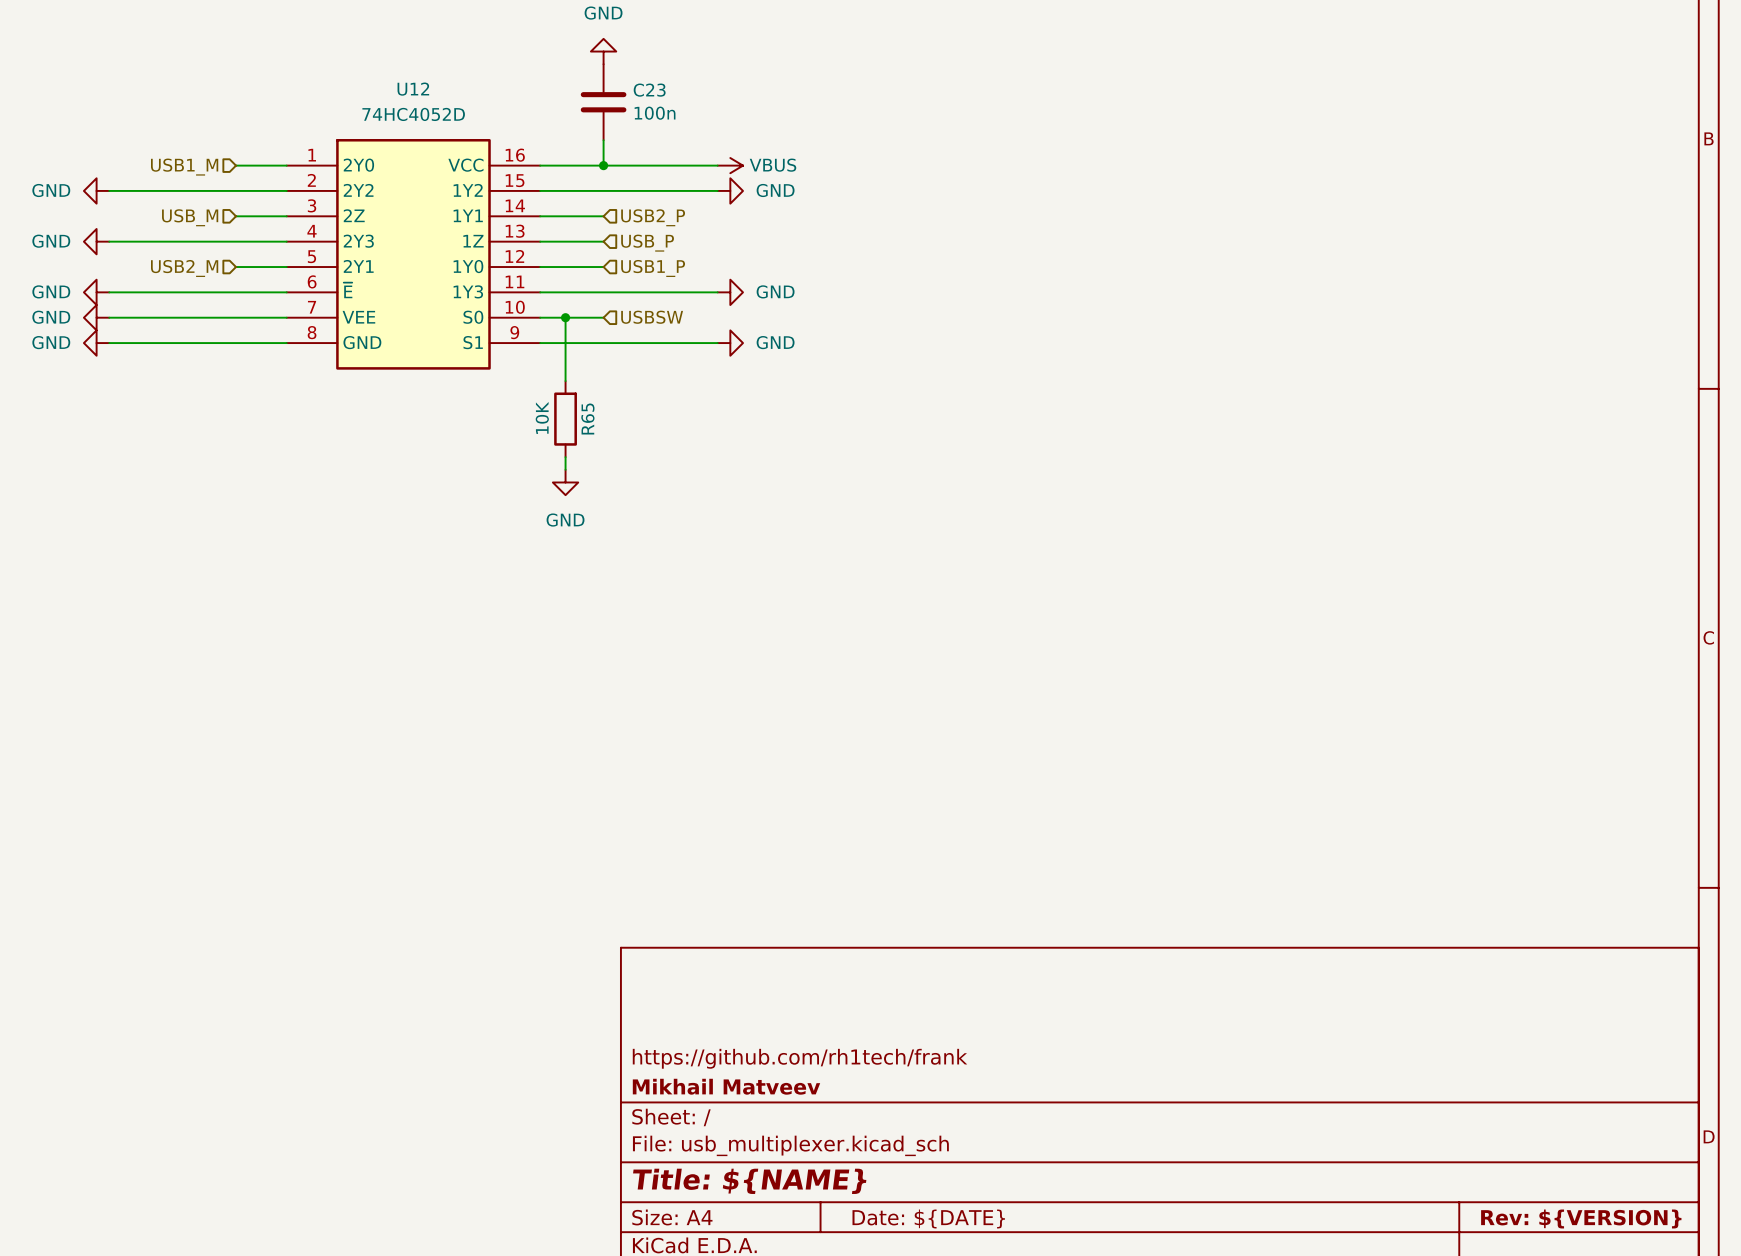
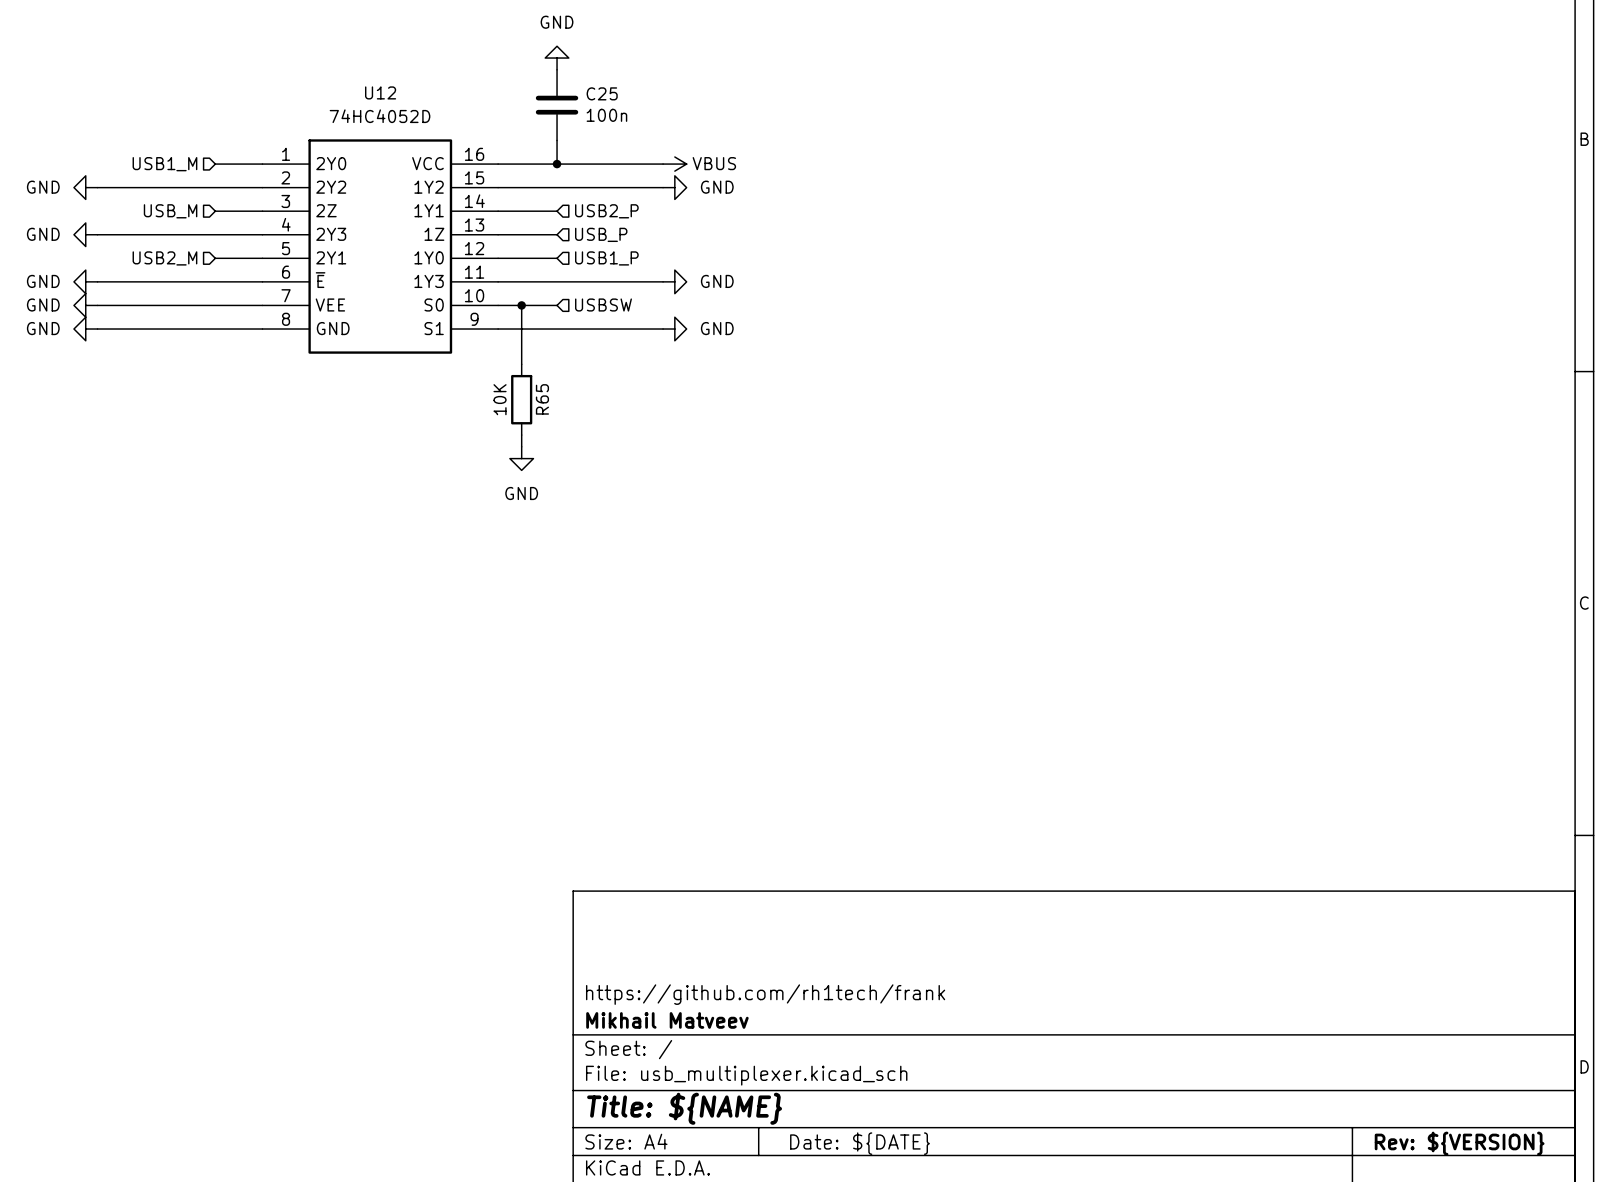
C23 name: C23 (649, 90) -> C25 (602, 93)

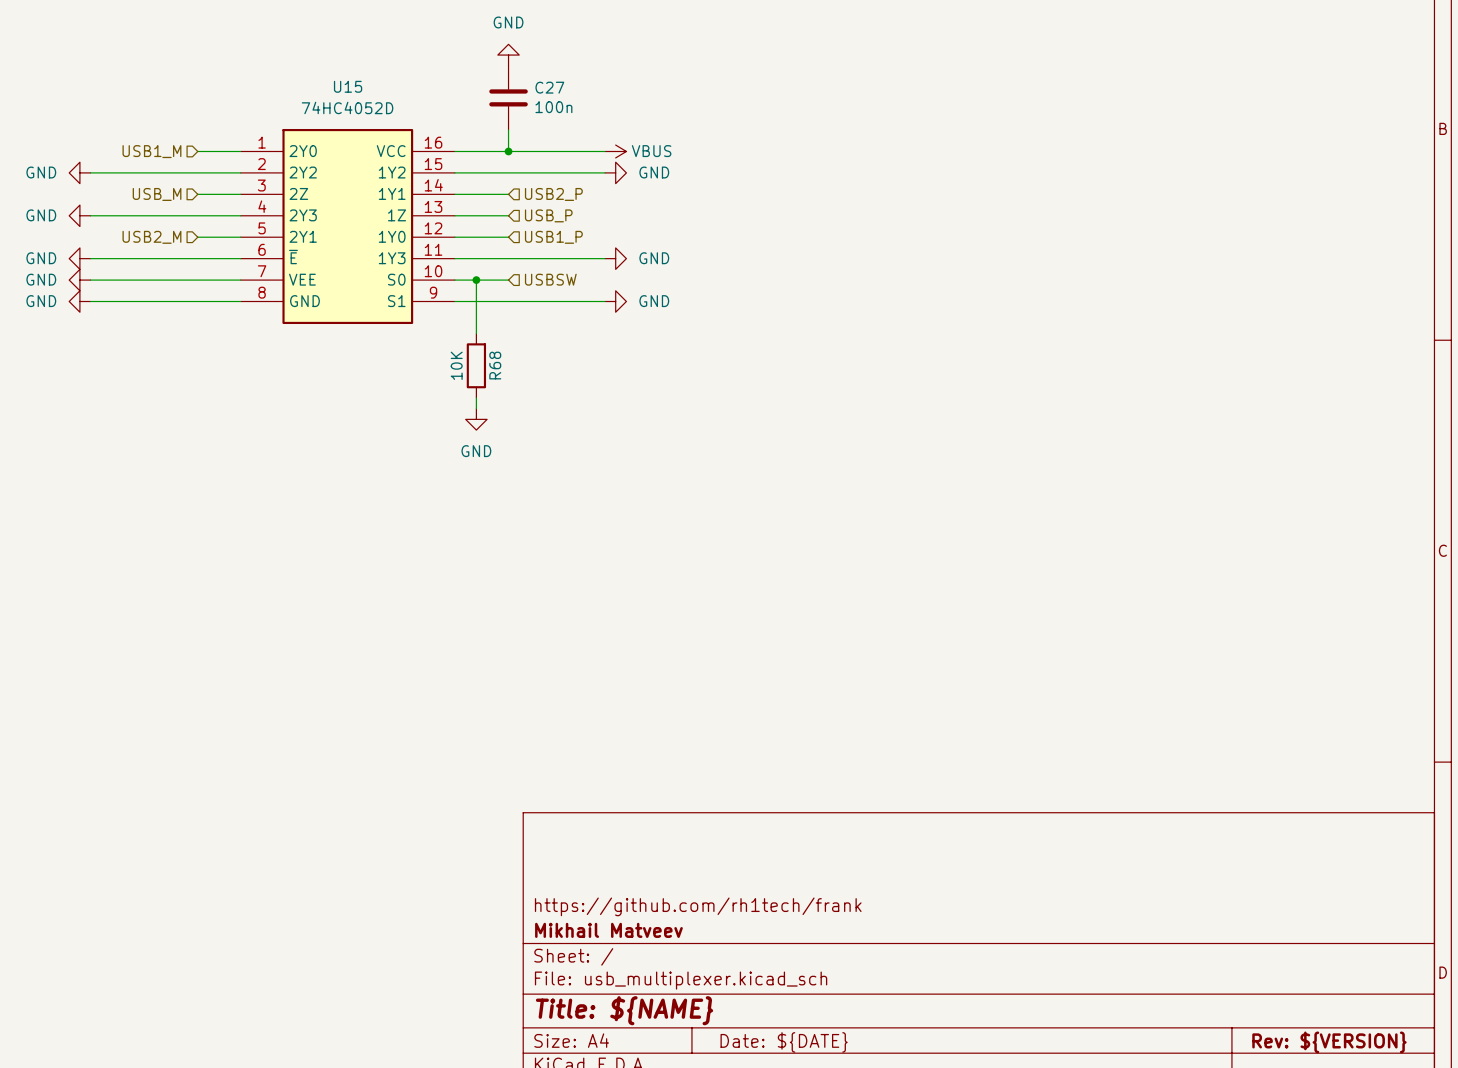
U12 name: U12 (380, 92) -> U15 (348, 86)
C25 name: C25 (602, 93) -> C27 (549, 87)
R65 name: R65 (542, 399) -> R68 (495, 365)

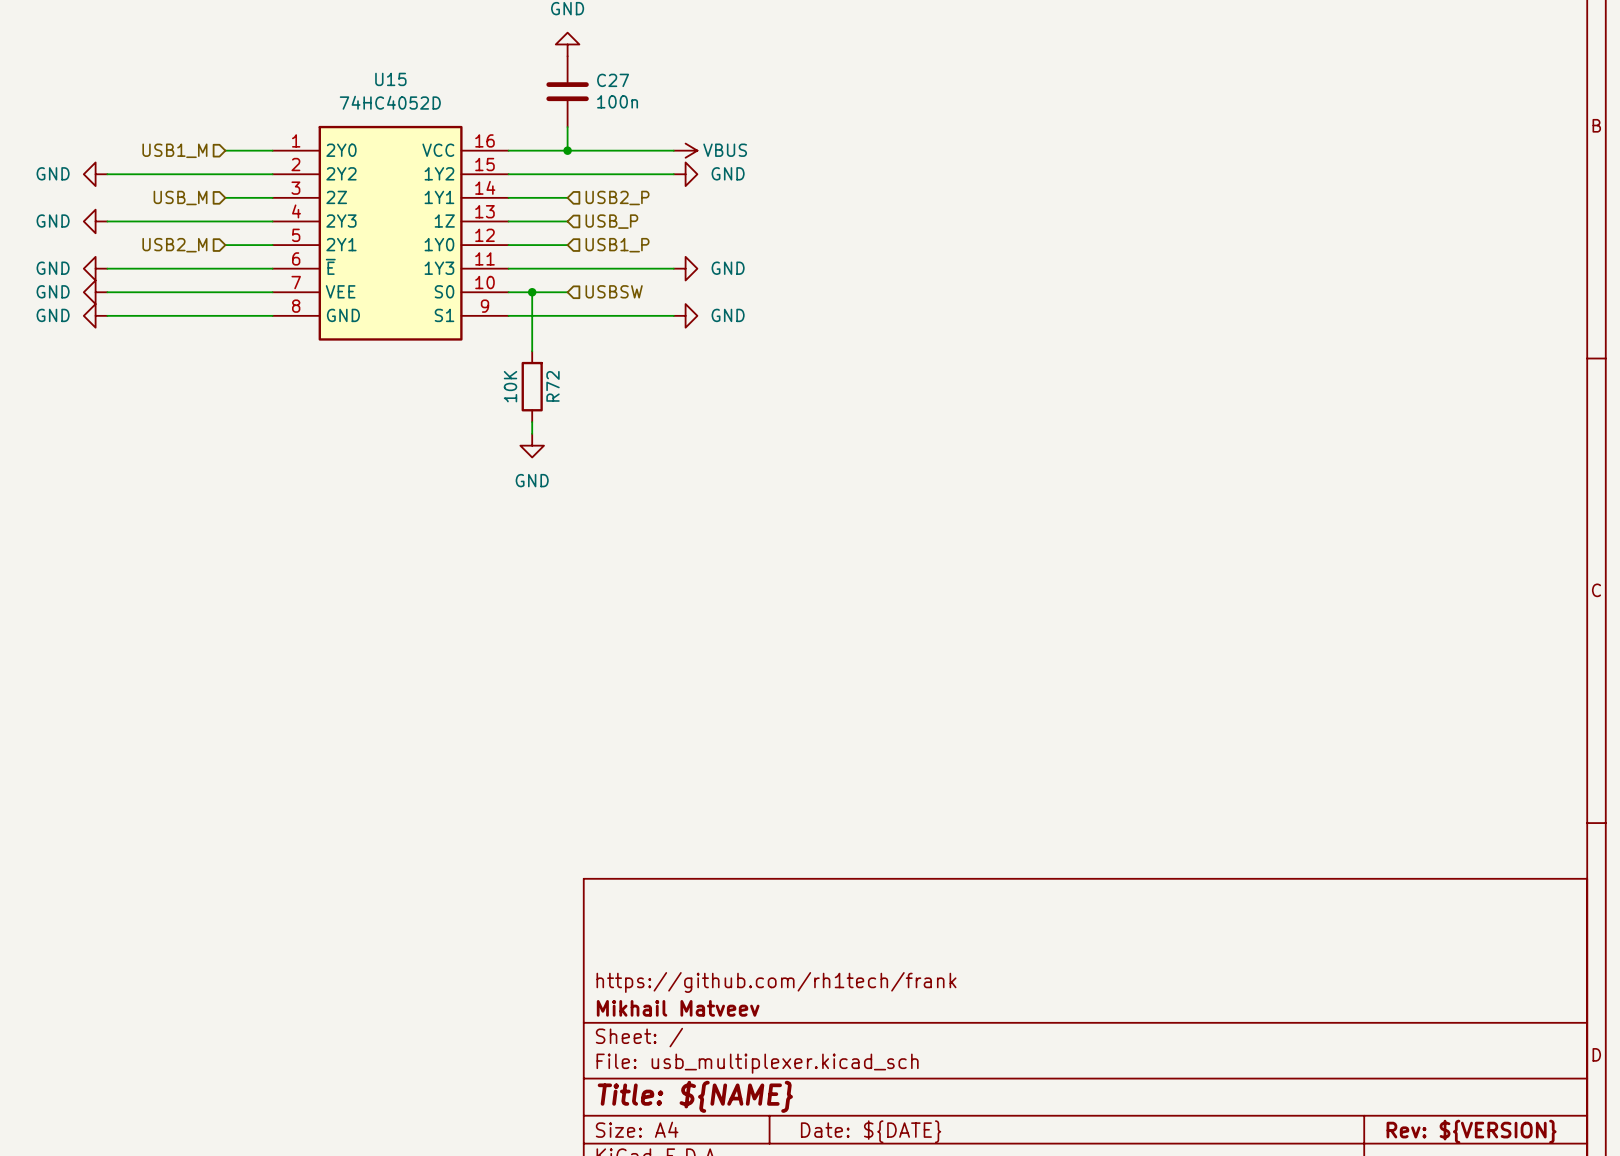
R68 name: R68 (495, 365) -> R72 (552, 386)

